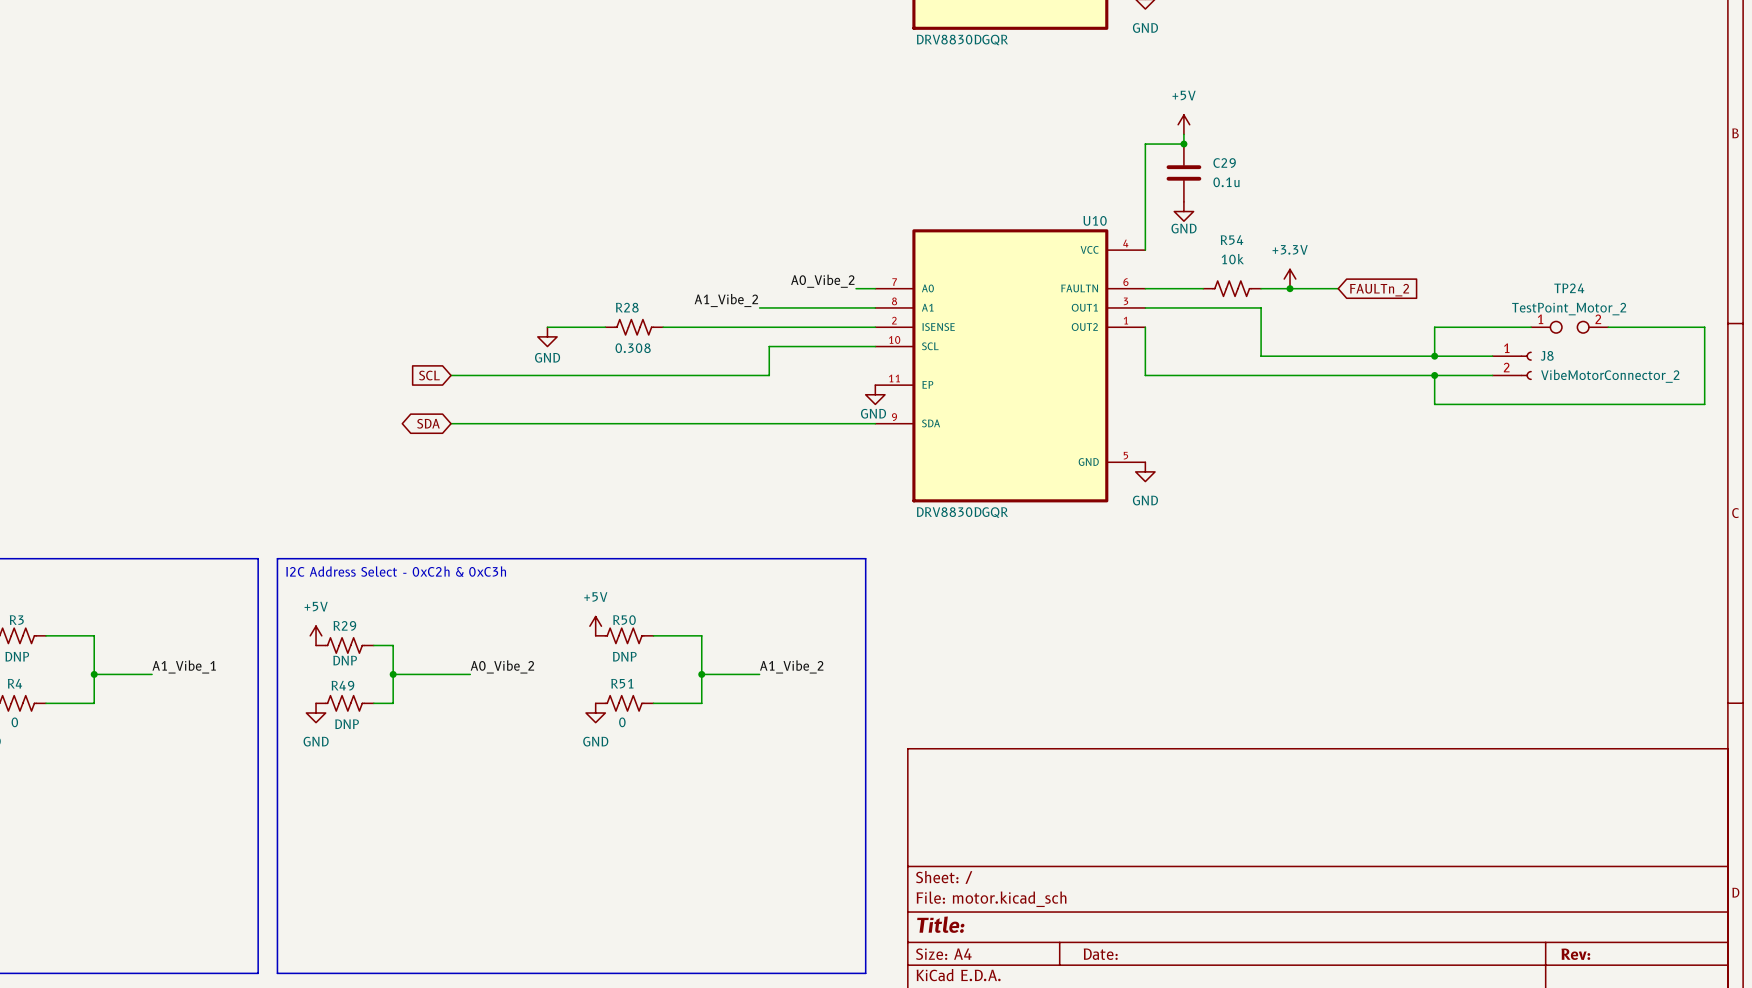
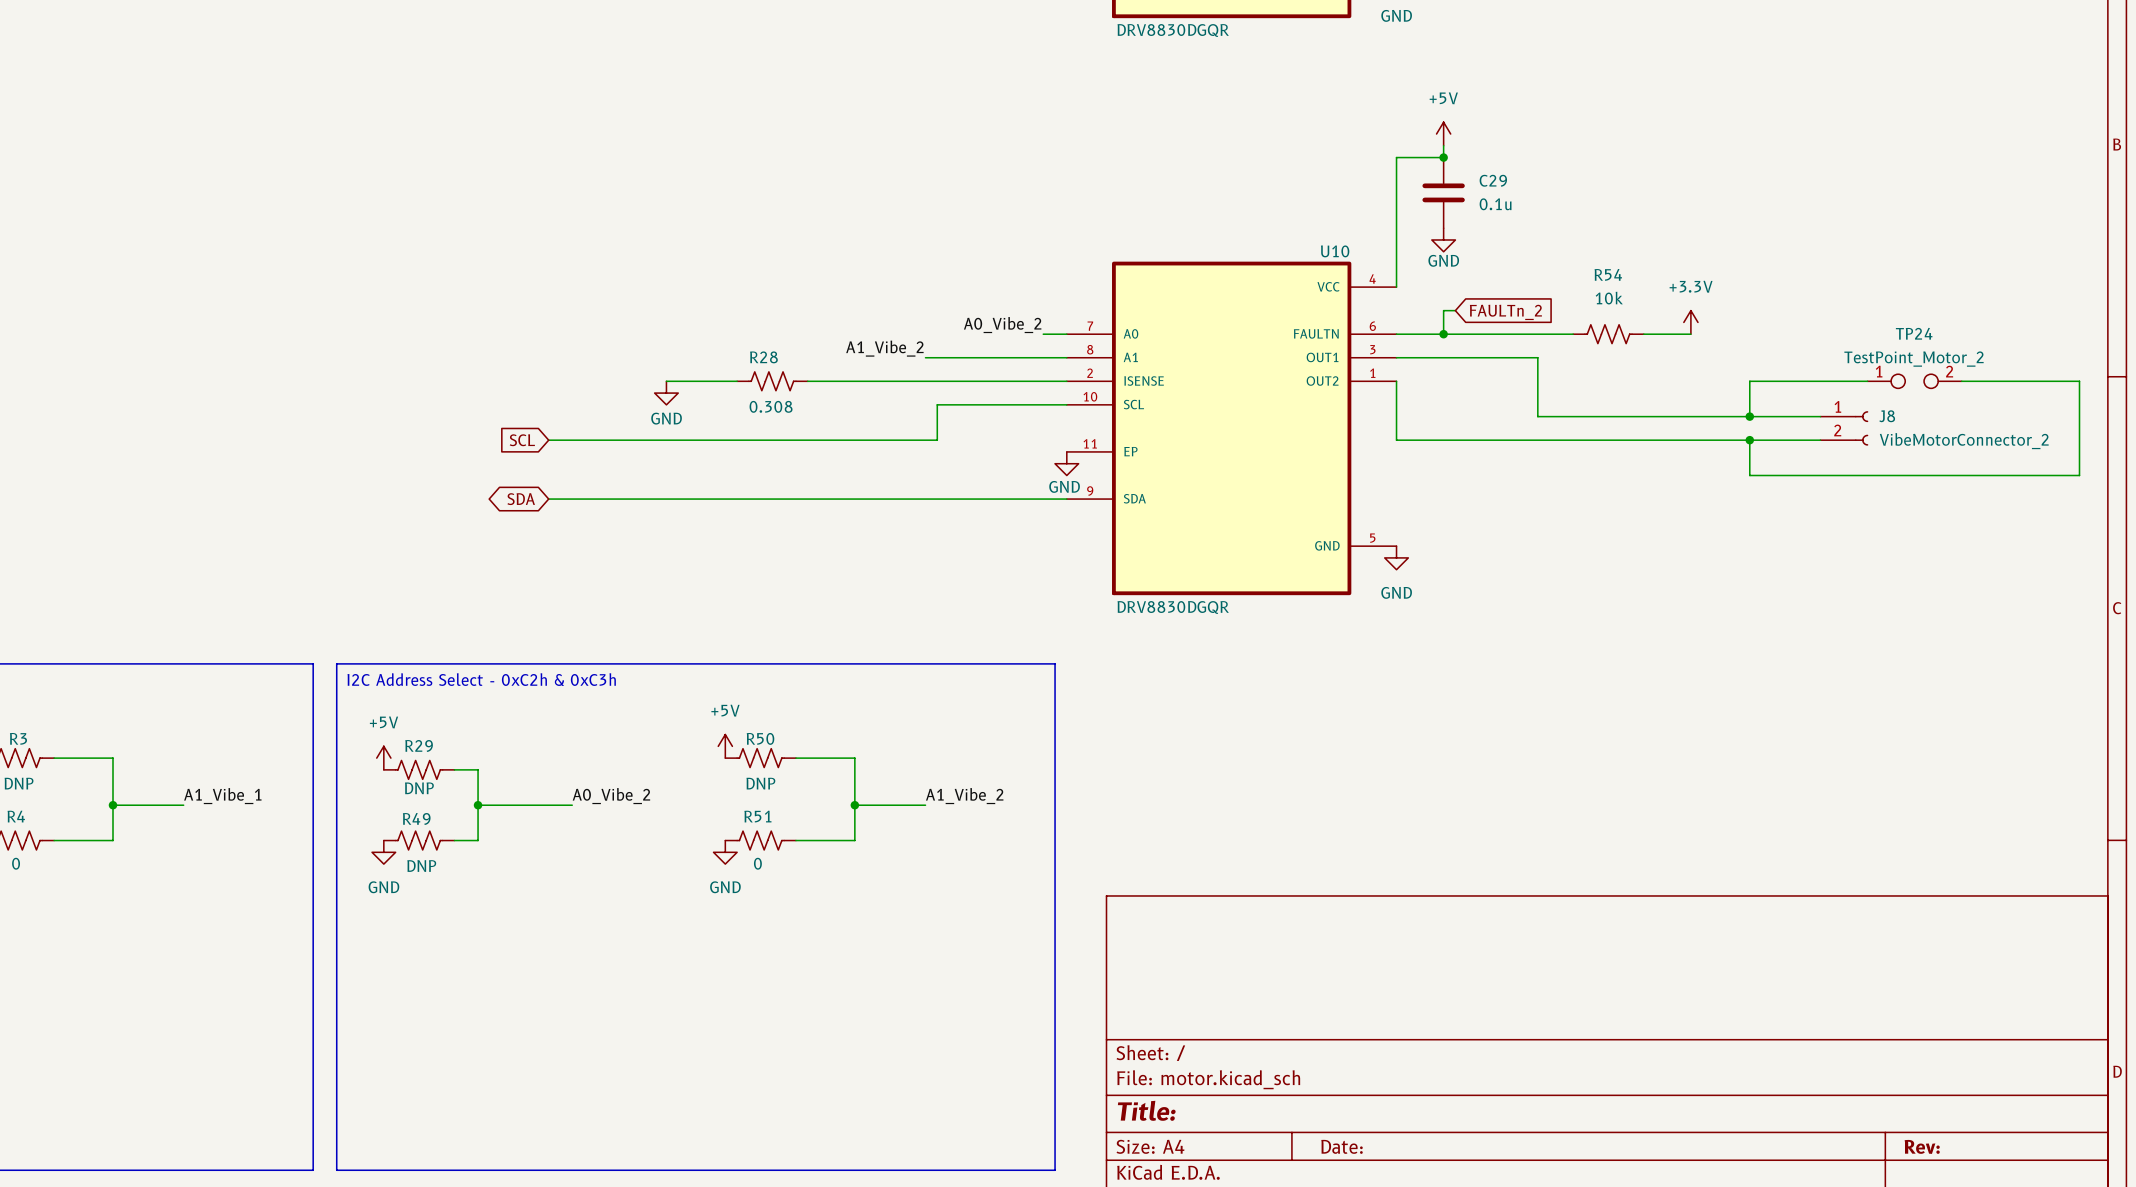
wire: none -> (1455, 310) (1443, 310) (1443, 334)
power symbol position: +3.3V (1290, 279) -> +3.3V (1690, 322)
junction: none -> (1443, 334)
R54 position: (1232, 288) -> (1608, 334)
junction: (1290, 288) -> none
wire: none -> (1643, 334) (1690, 334)
global label position: FAULTn_2 (1379, 290) -> FAULTn_2 (1505, 312)

